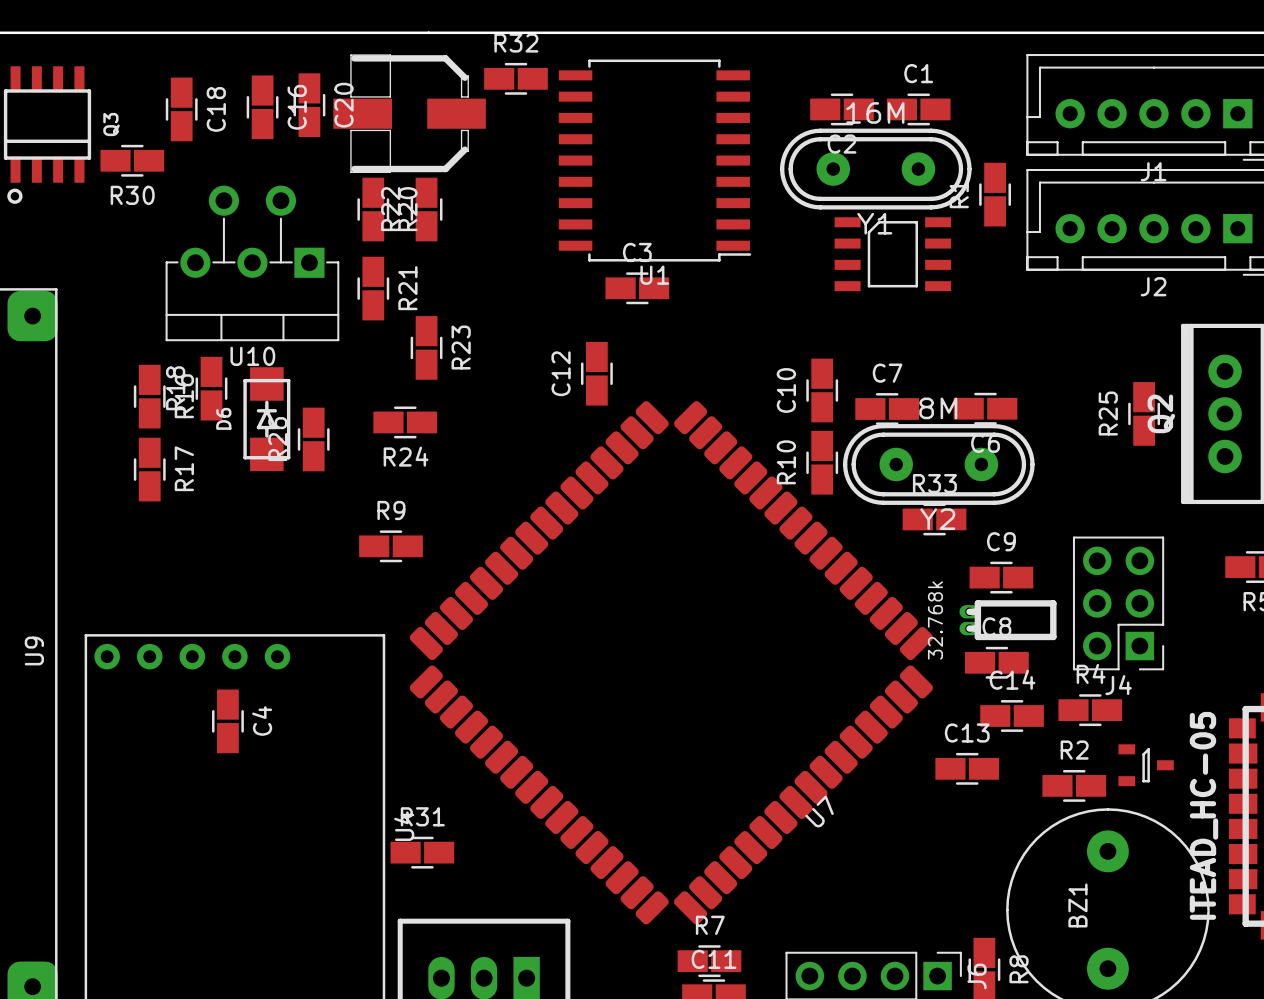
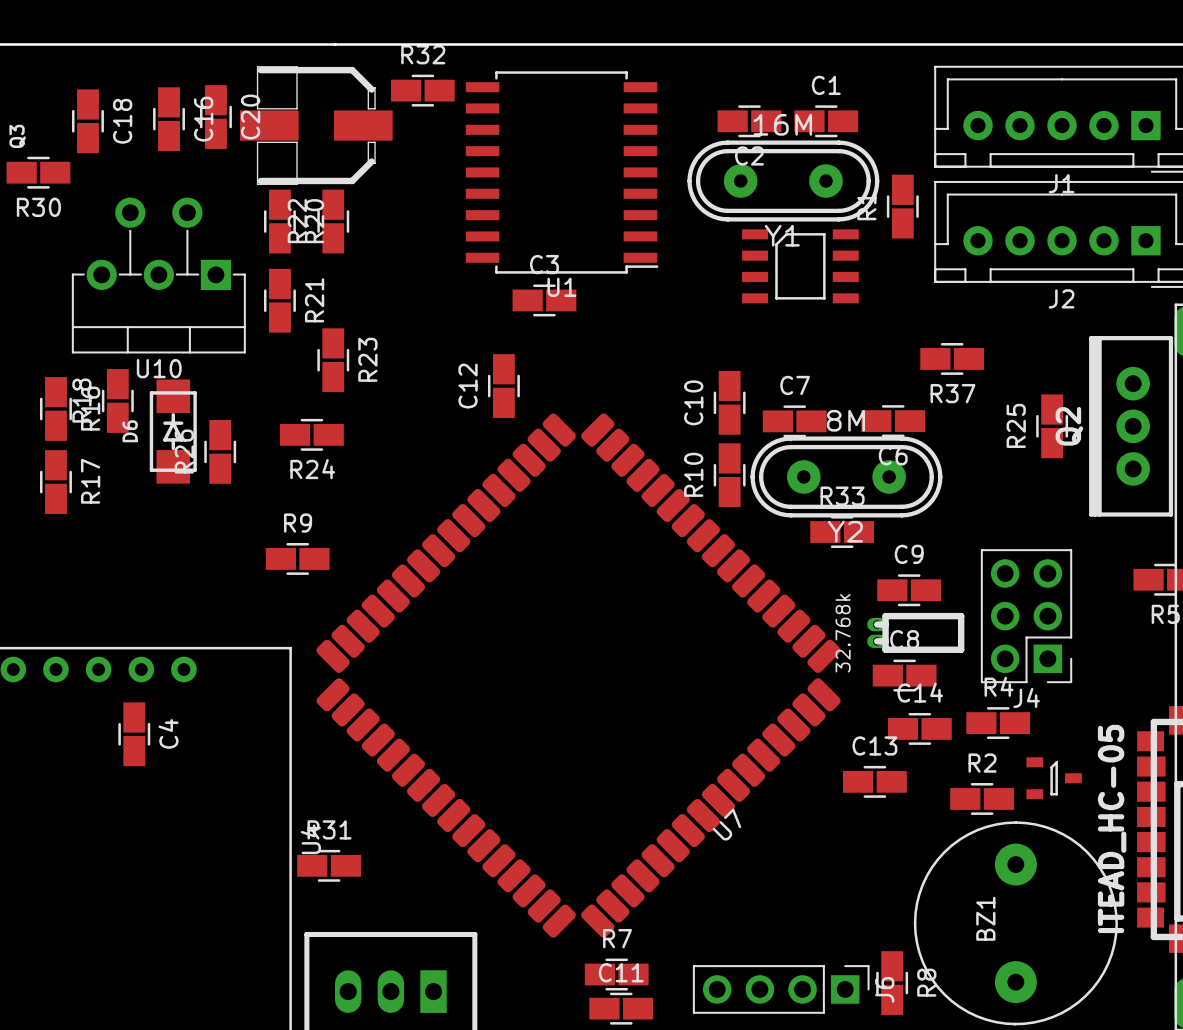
R37: none -> (952, 358)

